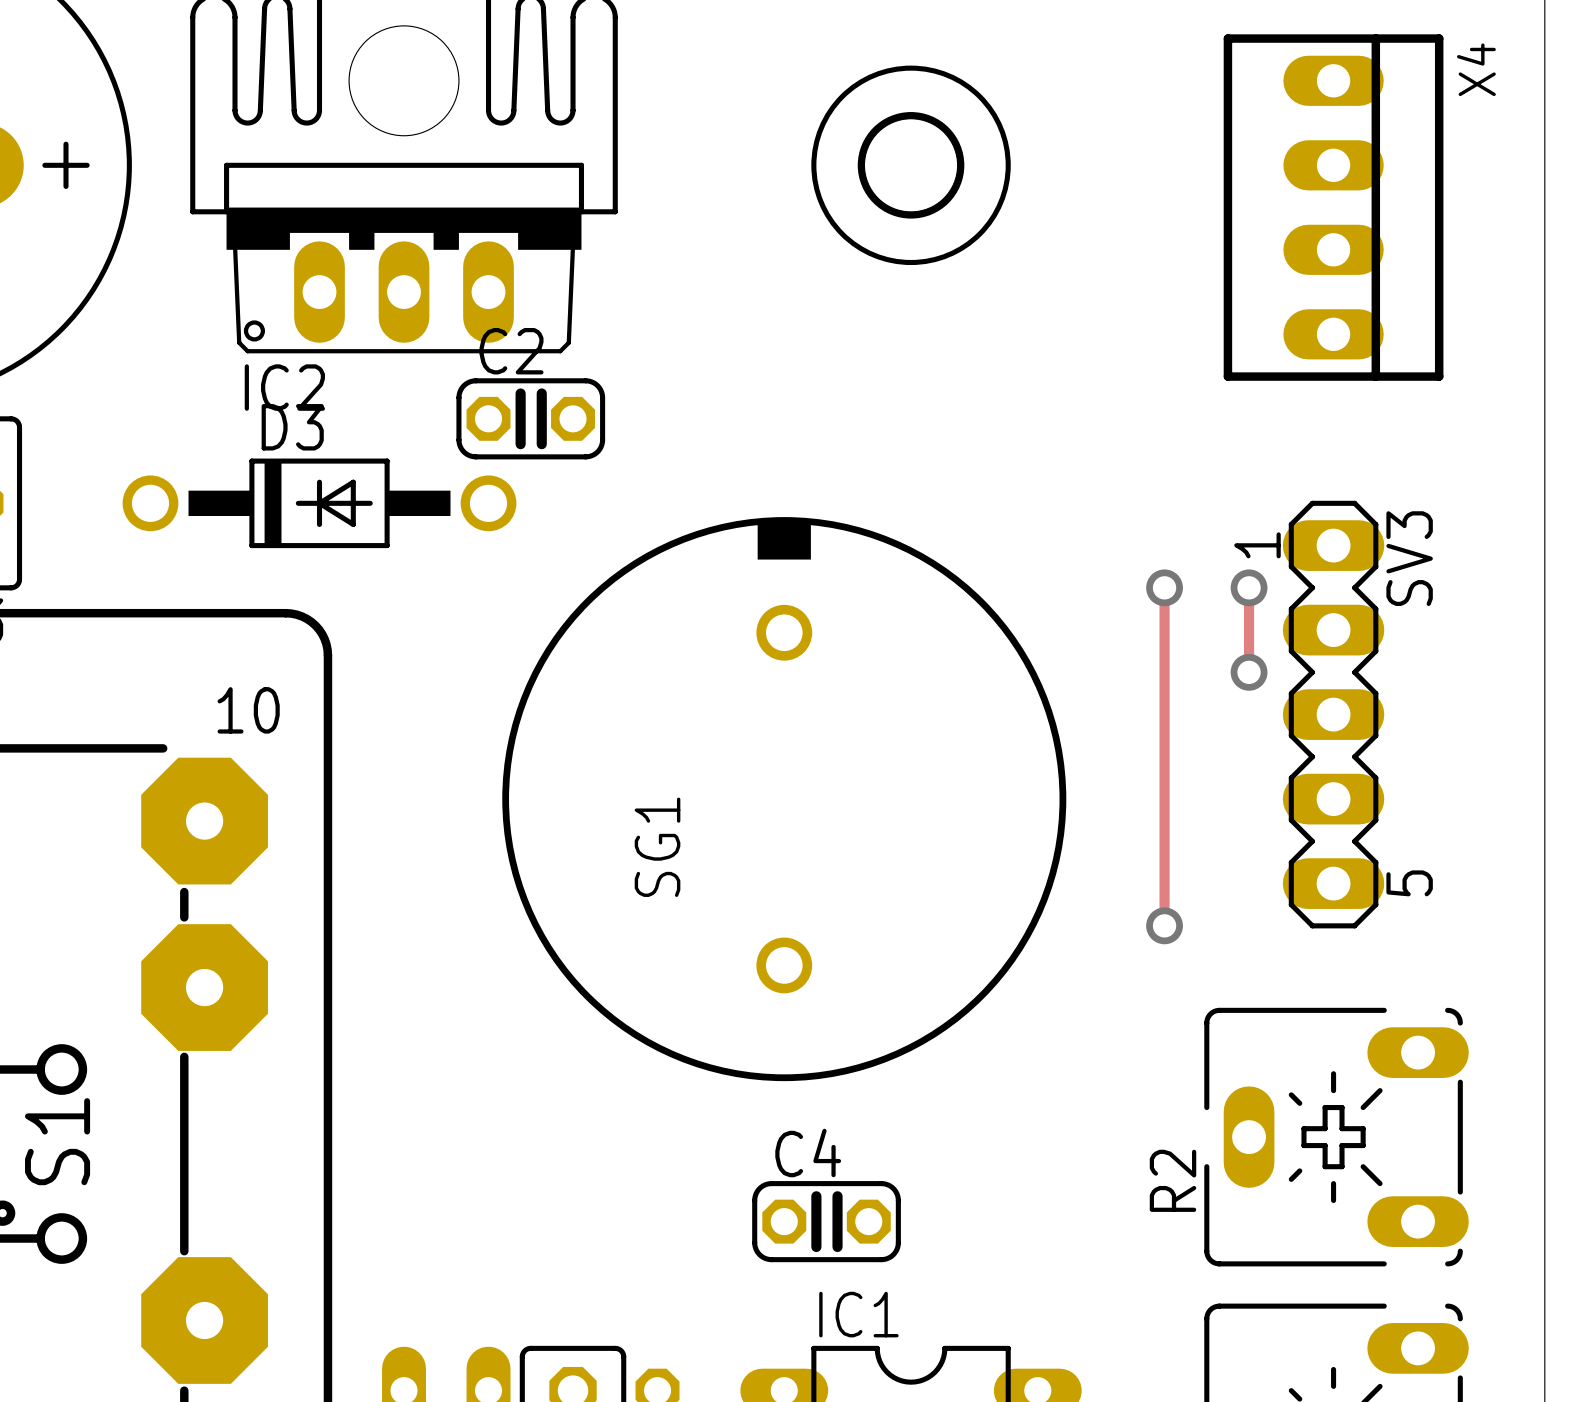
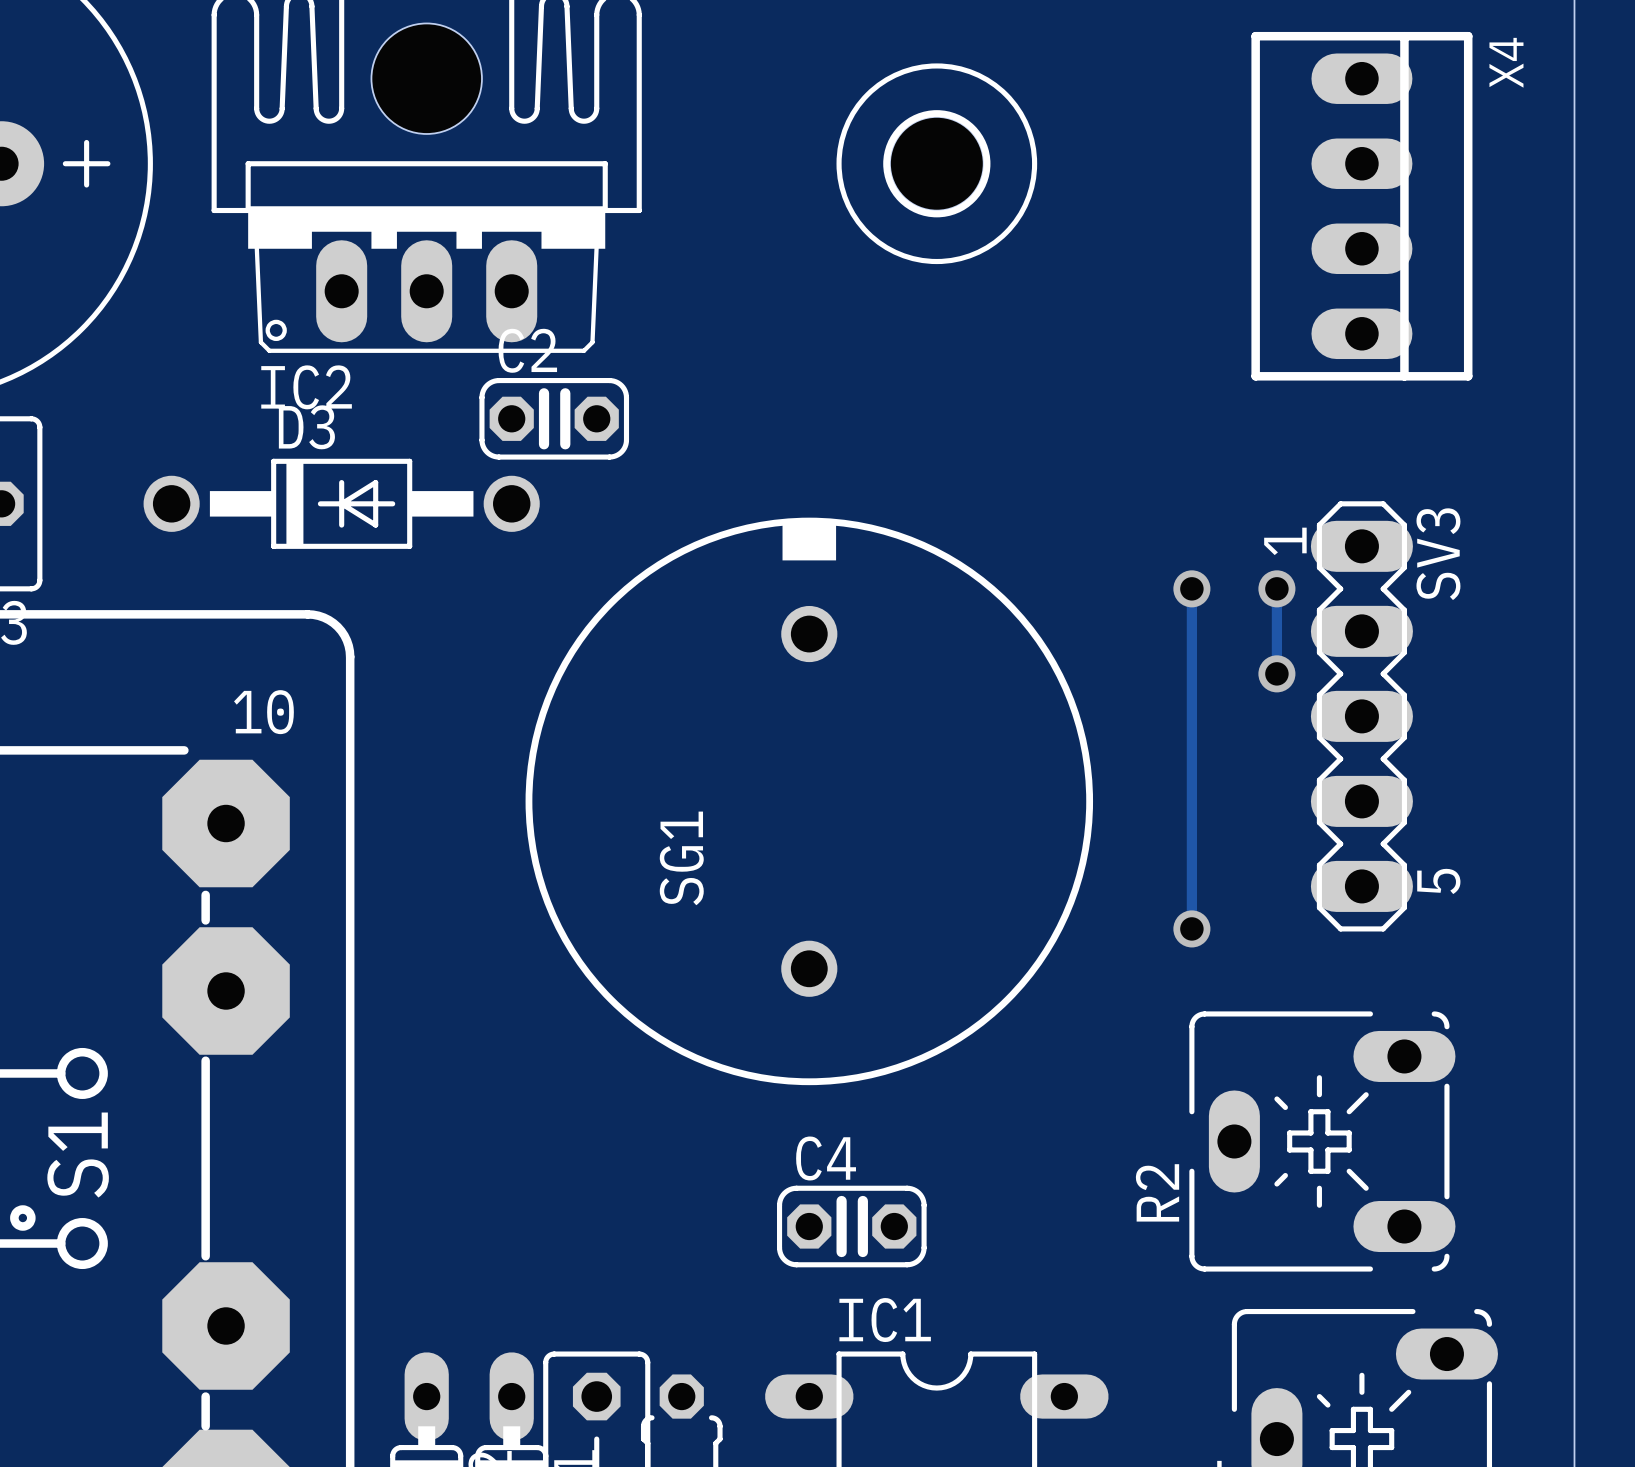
R2 position: (1336, 1137) -> (1322, 1141)

